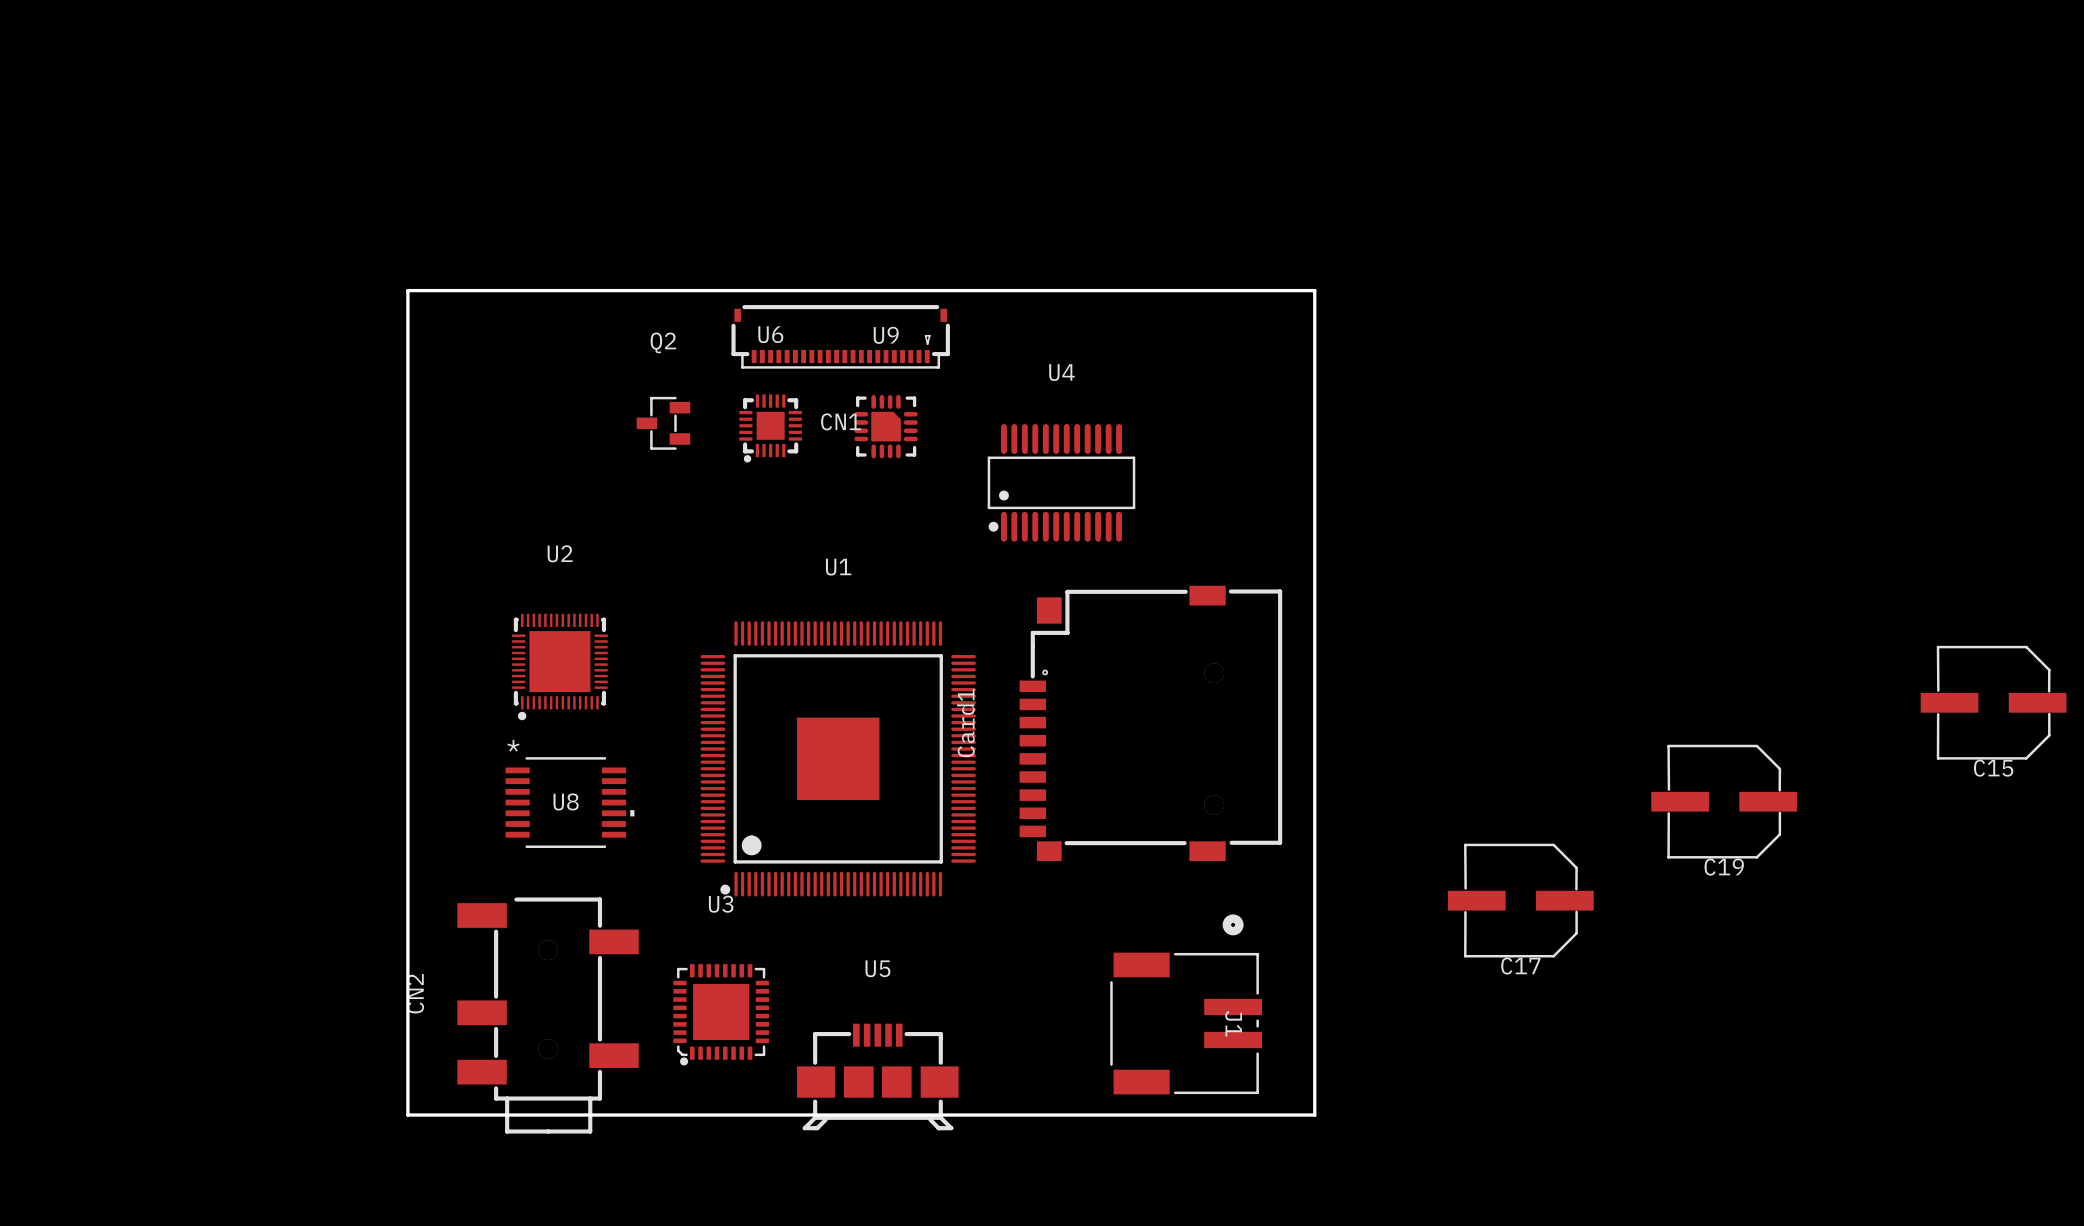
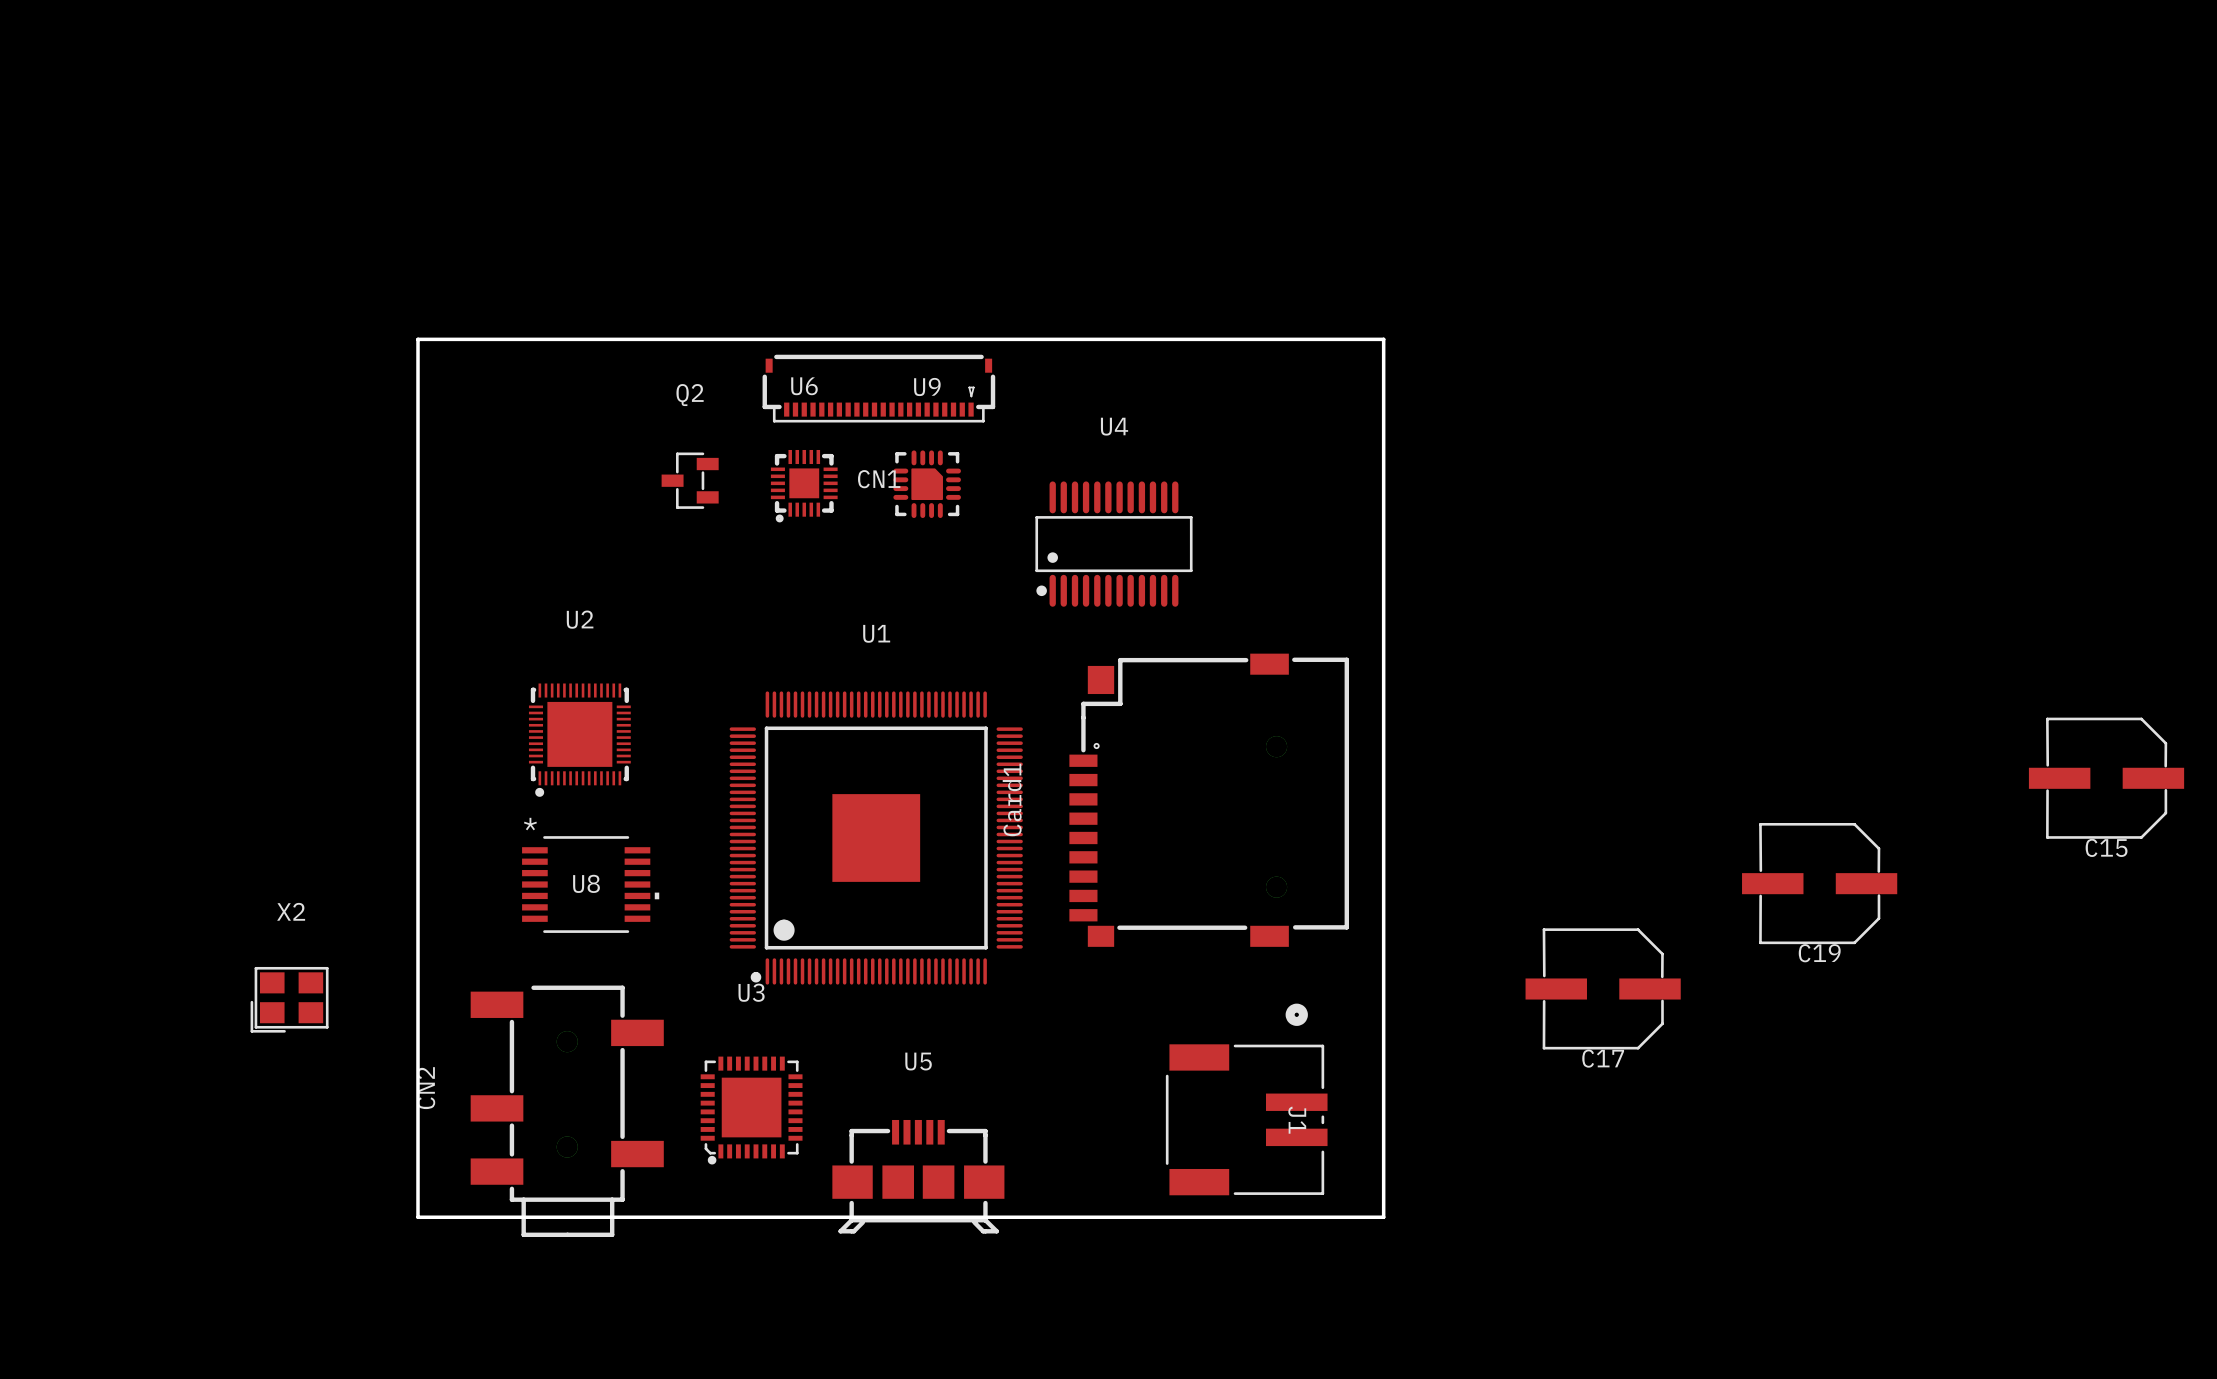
X2: none -> (289, 999)

